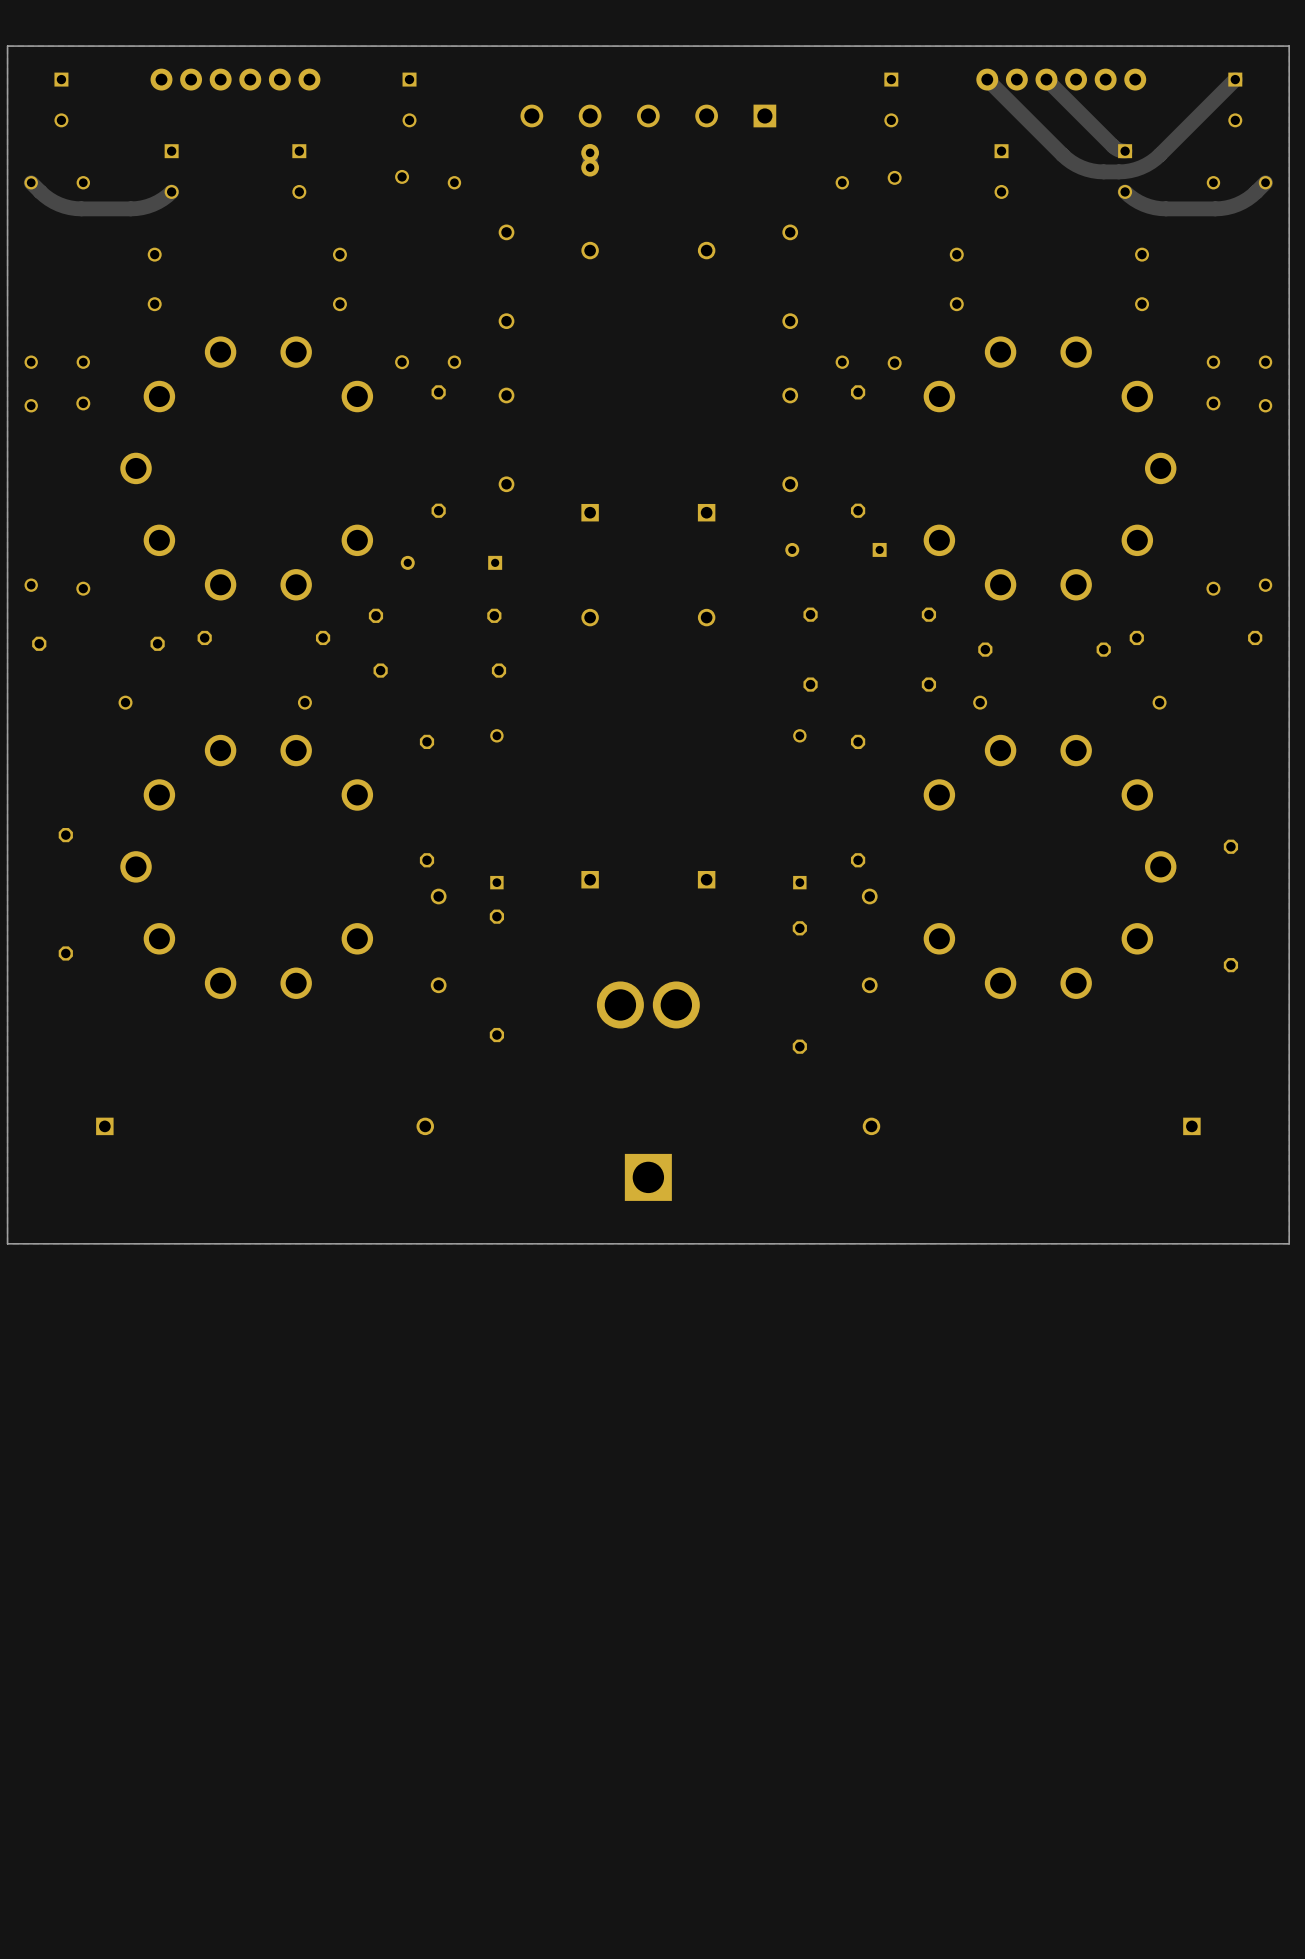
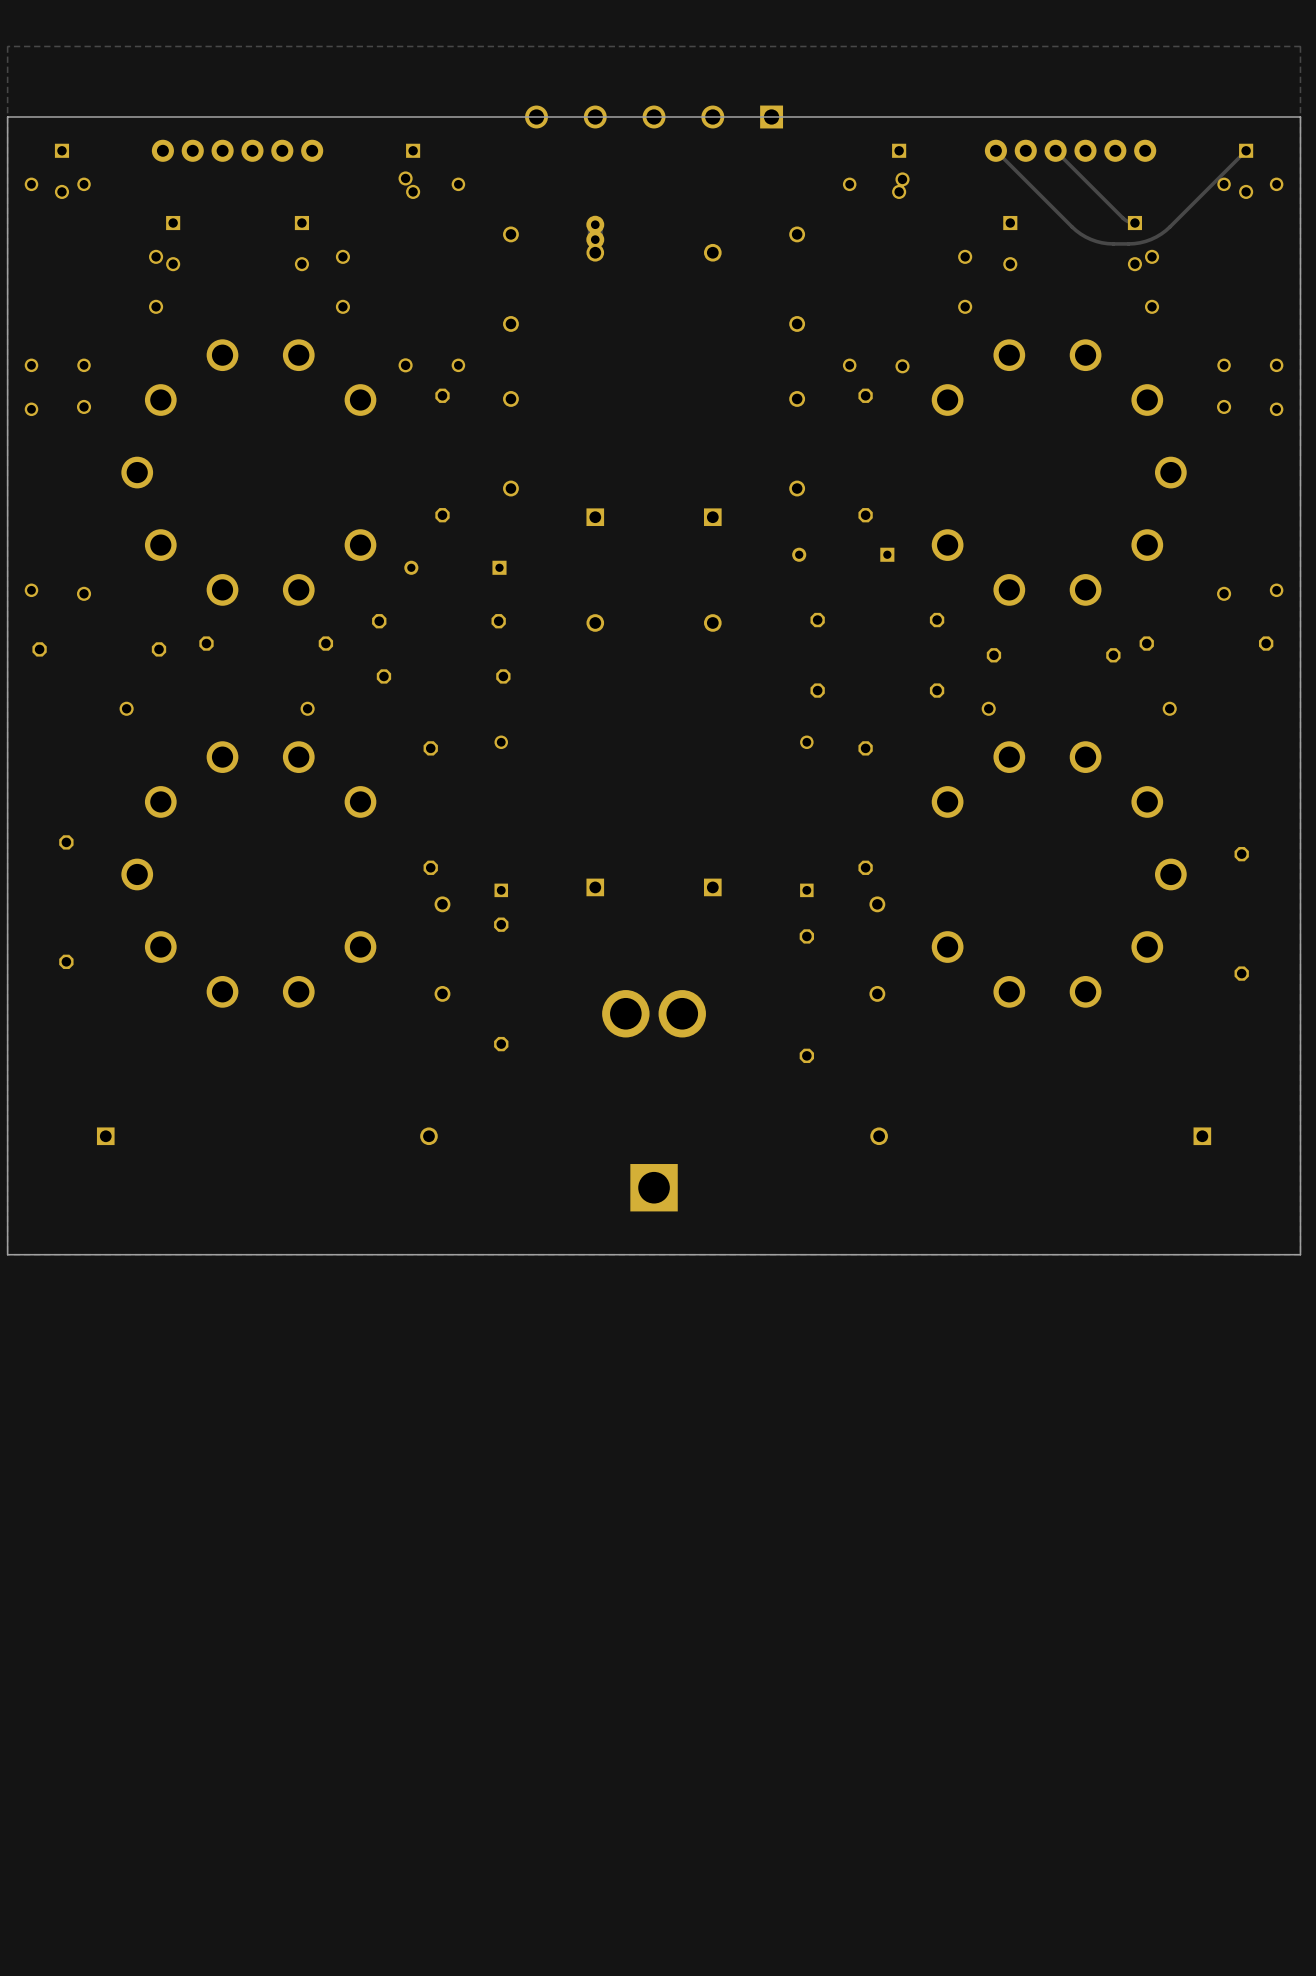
part position: (235, 79) -> (237, 150)
track: (1046, 79) (1113, 146) (1125, 151) -> (1055, 150) (1122, 217) (1134, 223)
part position: (1061, 79) -> (1070, 150)
track: (1235, 79) (1155, 158) (1135, 169) (1118, 171) (1092, 170) (1071, 162) (987, 79) -> (1246, 150) (1165, 230) (1145, 241) (1128, 243) (1101, 242) (1080, 234) (995, 150)
part: (61, 99) -> none
part: (409, 99) -> none
part: (891, 99) -> none
part: (1235, 99) -> none
board edge: (1289, 115) (1289, 46) (7, 46) (7, 115) -> (1300, 117) (7, 117)
part position: (590, 160) -> (595, 232)
part: none -> (61, 171)
part: none -> (413, 171)
part: none -> (899, 171)
part: none -> (1246, 171)
part: (171, 171) -> none
part: (299, 171) -> none
part: (1001, 171) -> none
part: (1125, 171) -> none
track: (31, 182) (54, 202) (75, 208) (142, 207) (158, 202) (171, 191) -> none
track: (1265, 182) (1242, 202) (1220, 208) (1154, 207) (1138, 202) (1125, 191) -> none
part: none -> (173, 243)
part: none -> (301, 243)
part: none -> (1010, 243)
part: none -> (1134, 243)

